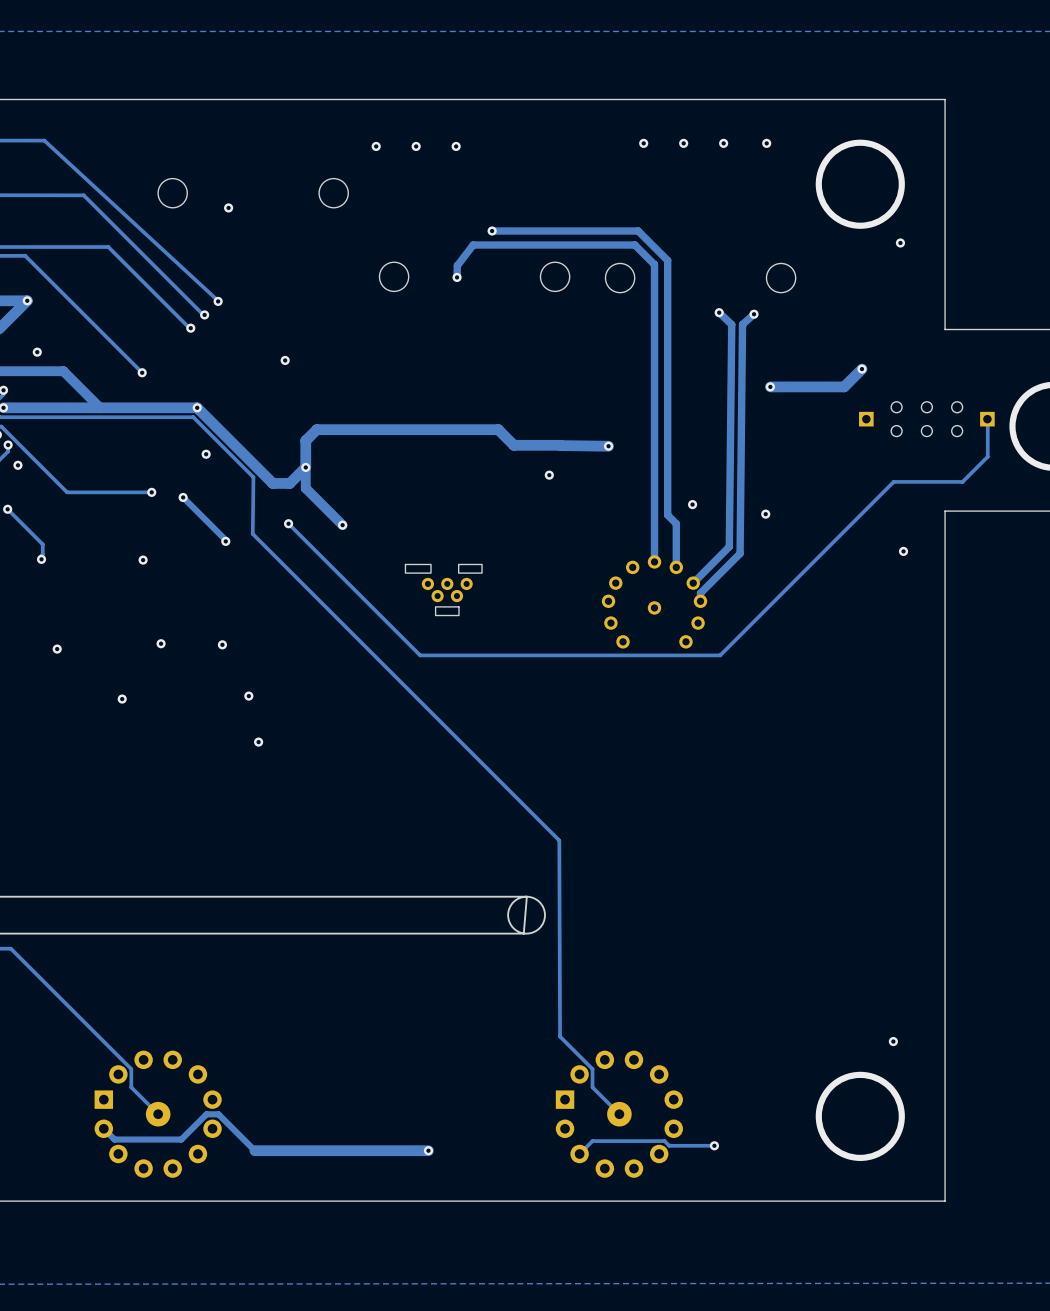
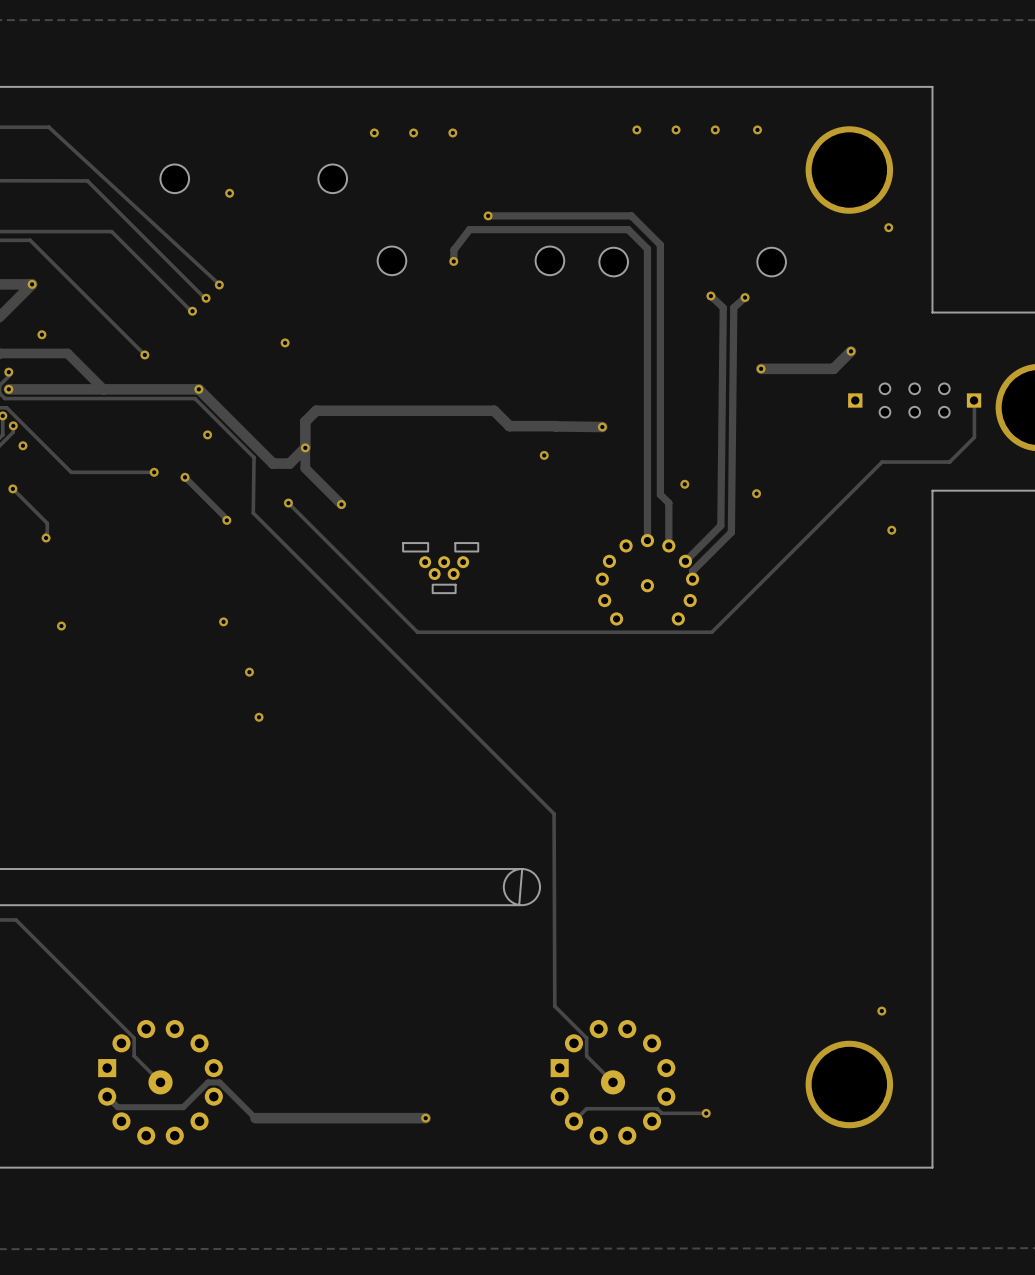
via: (143, 560) -> none
via: (161, 643) -> none
via: (122, 699) -> none

